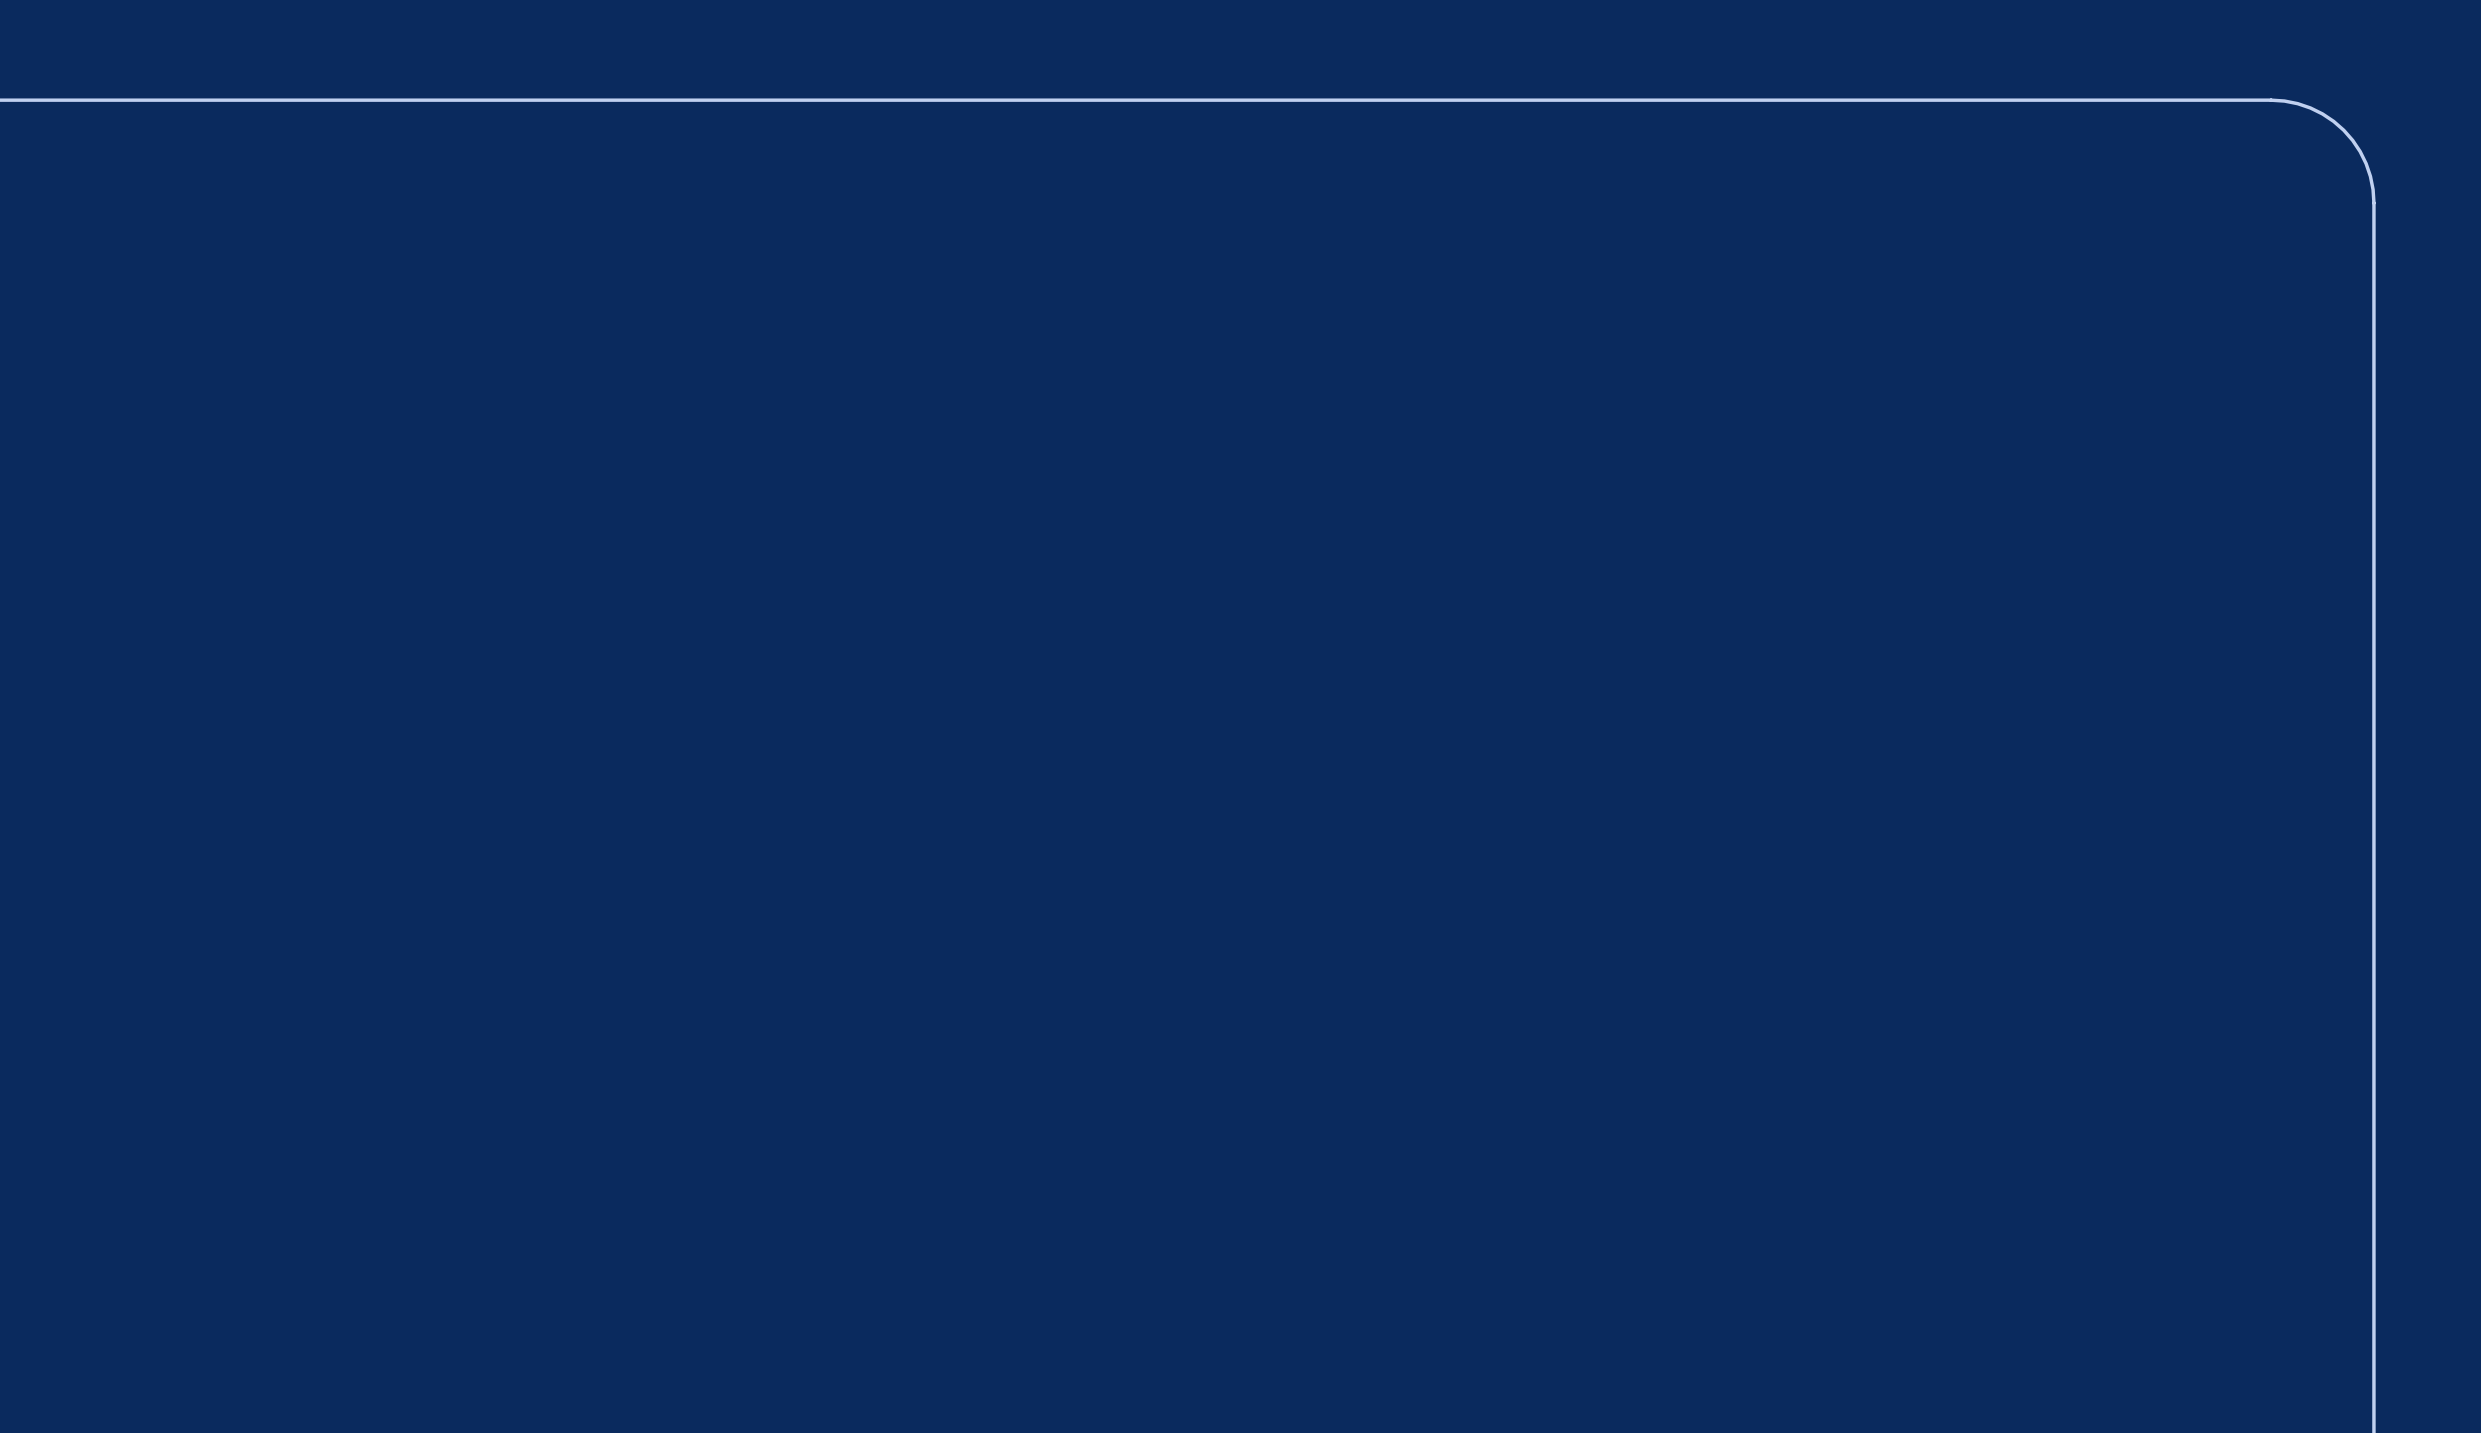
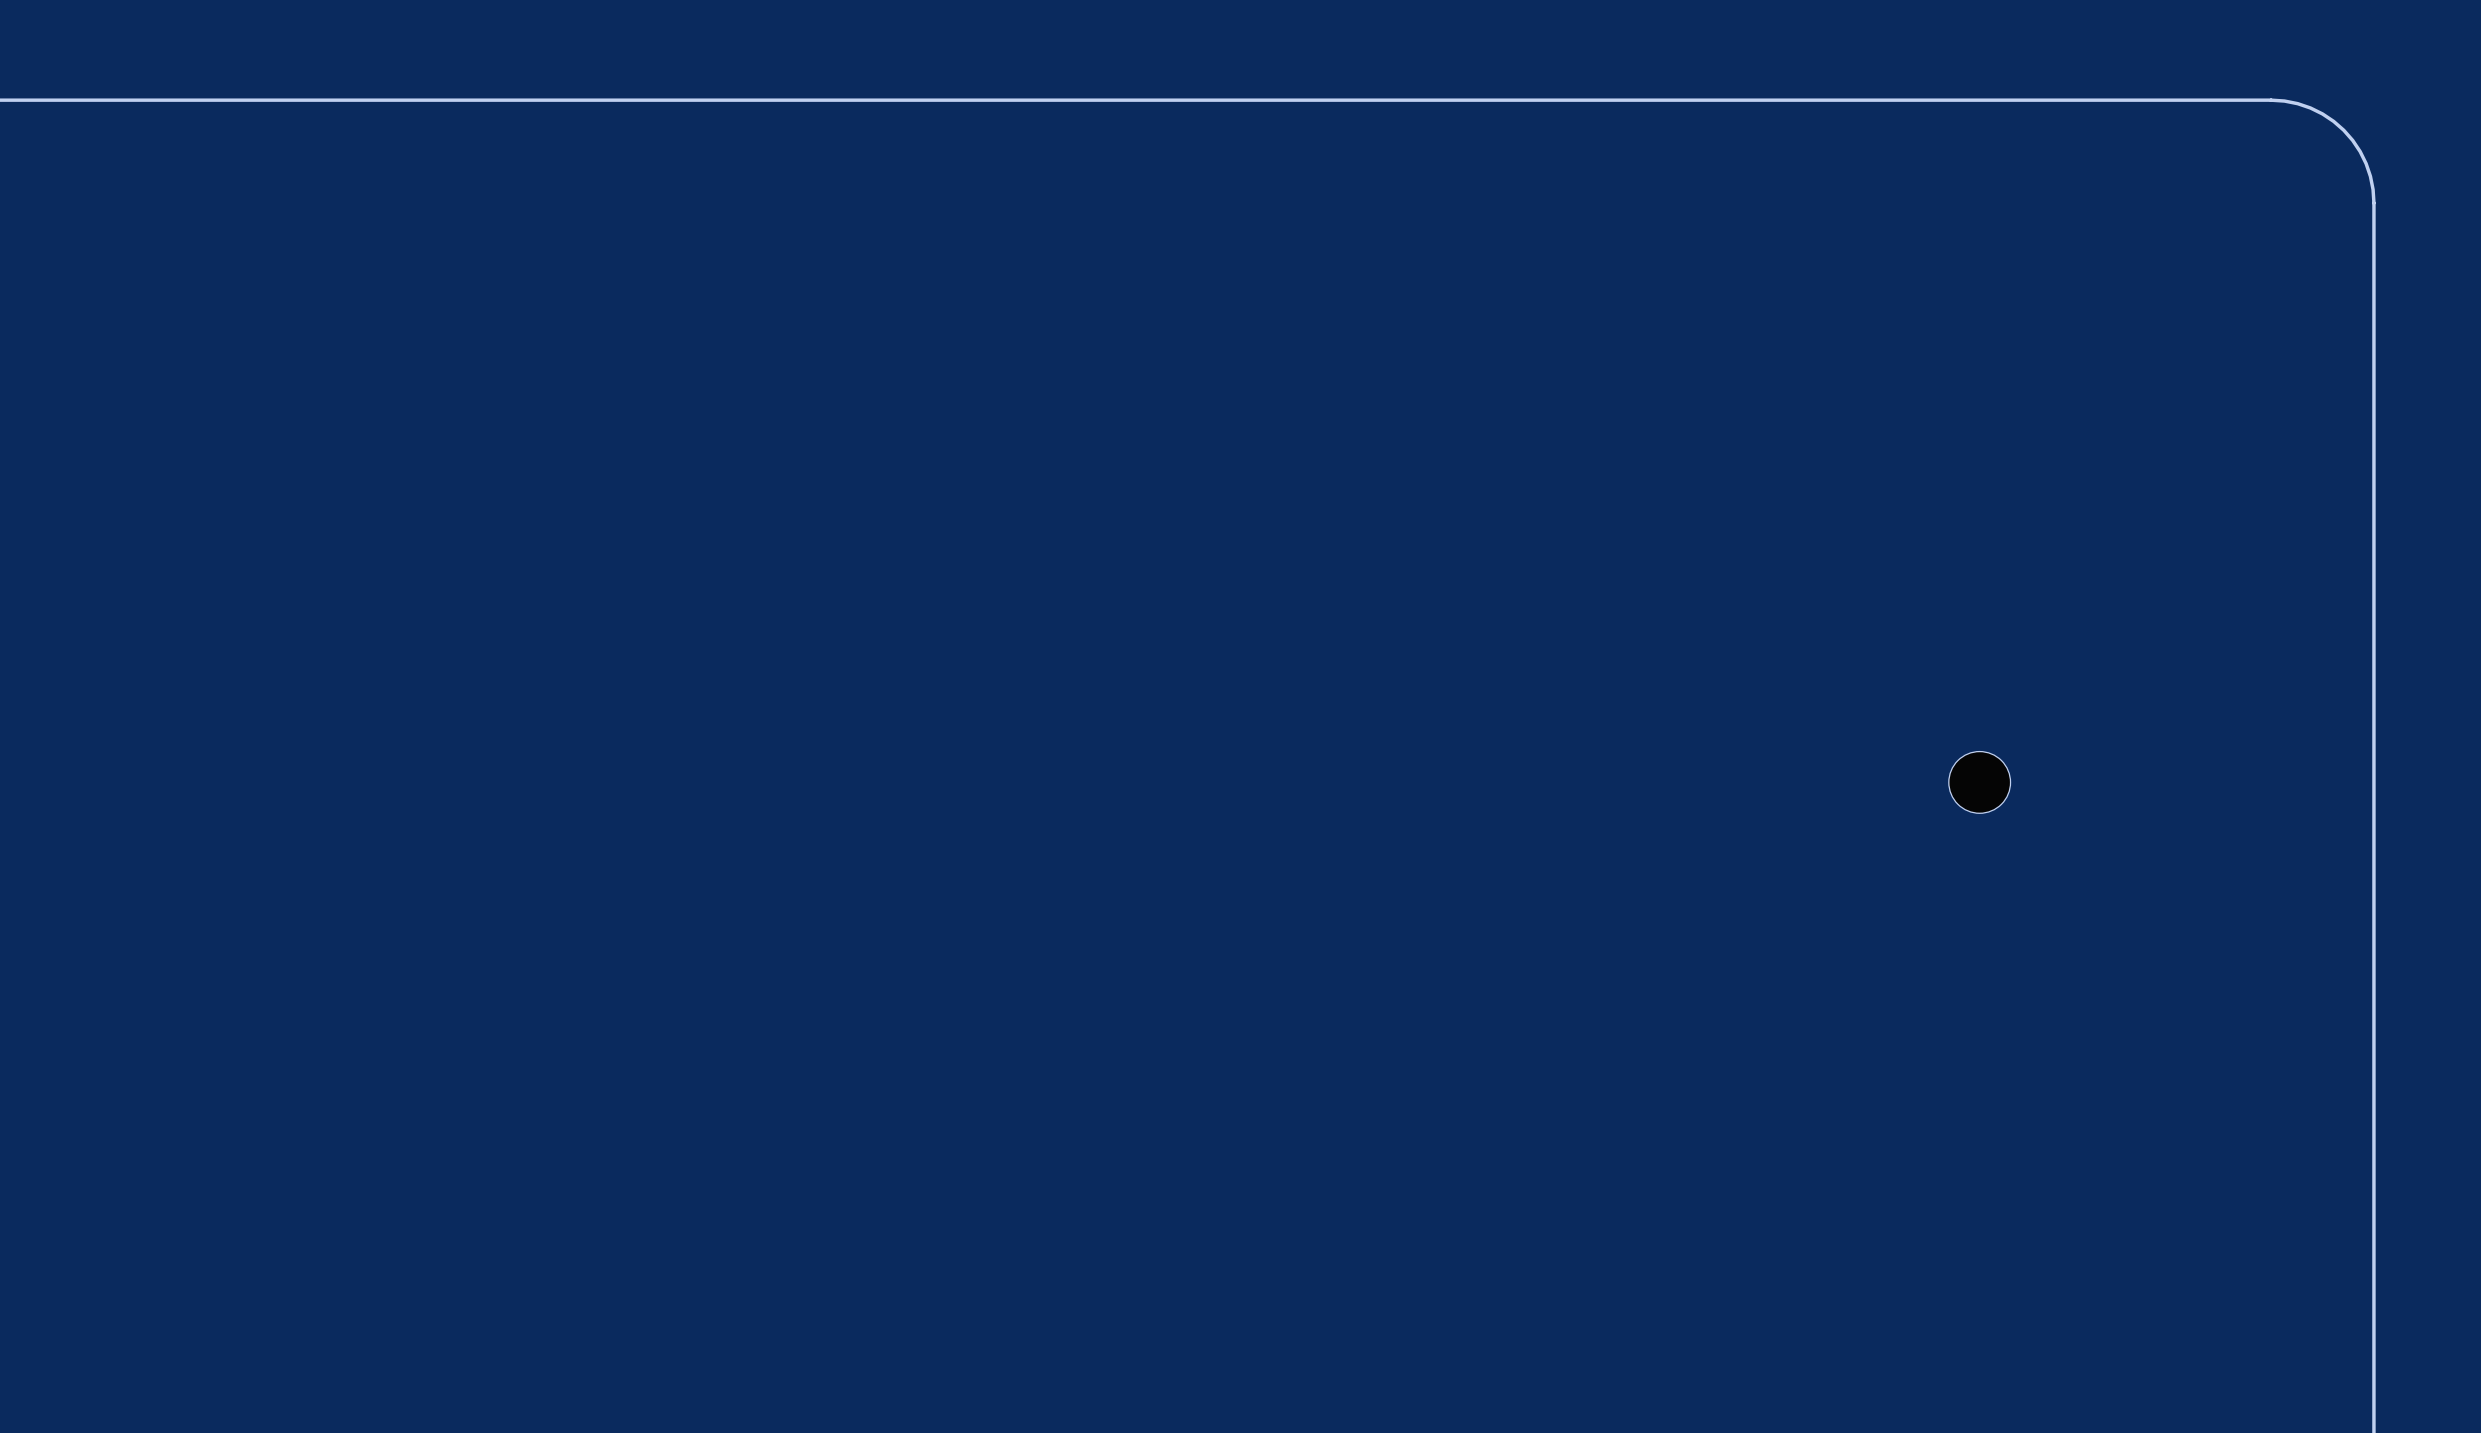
part: none -> (1979, 782)

